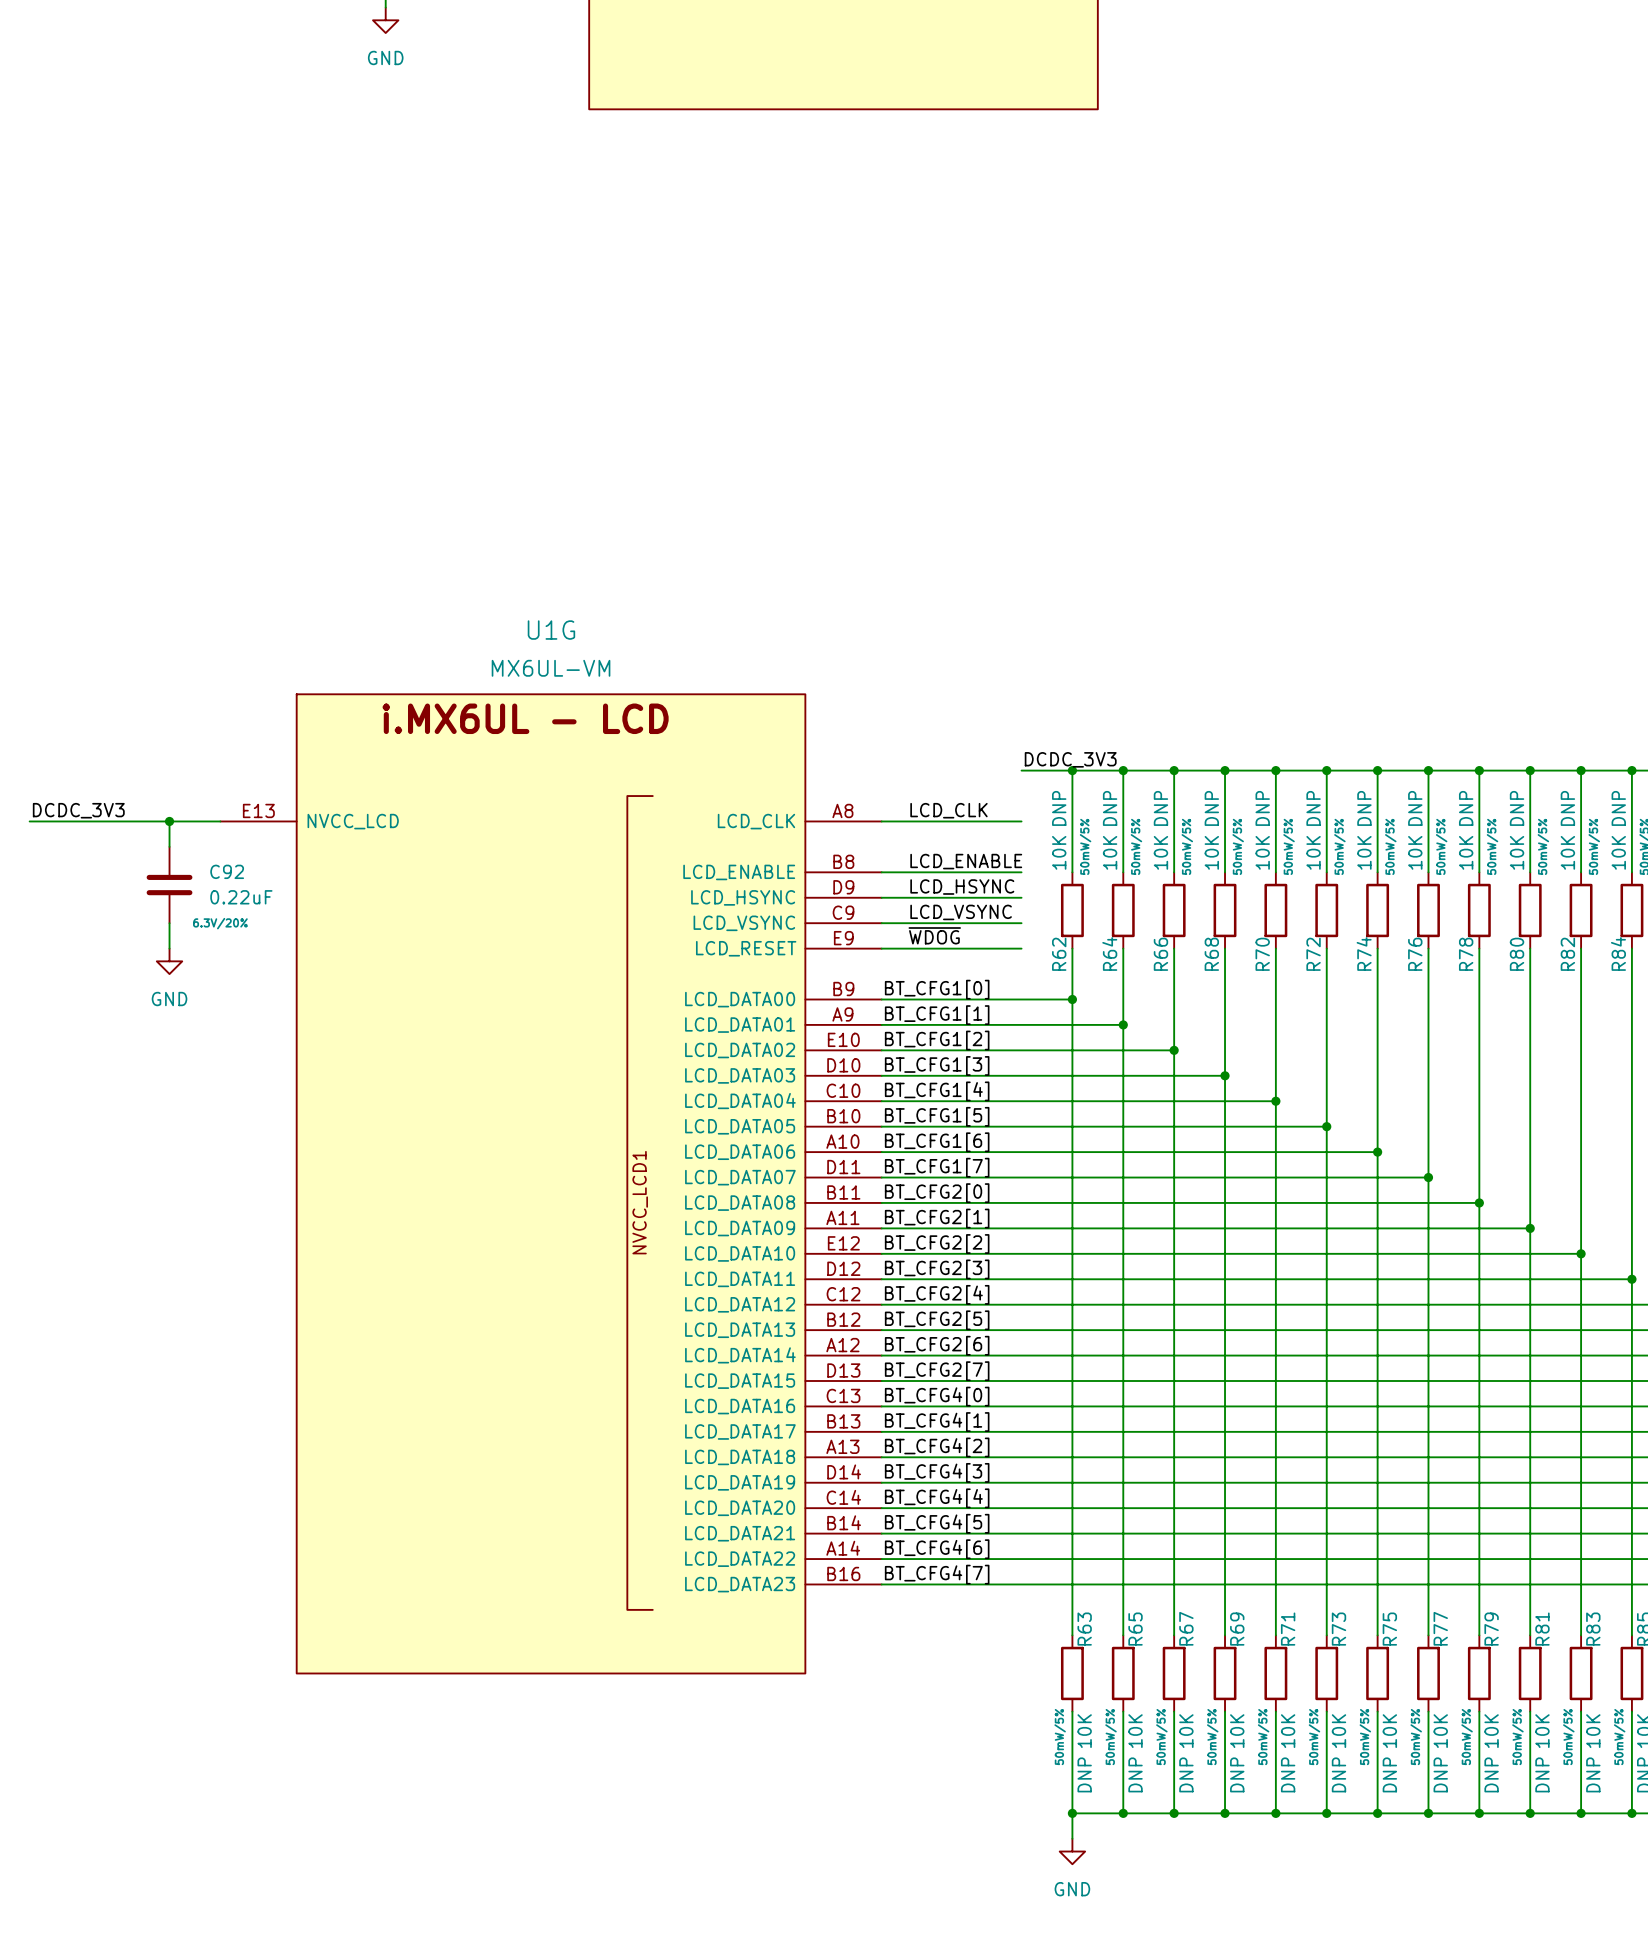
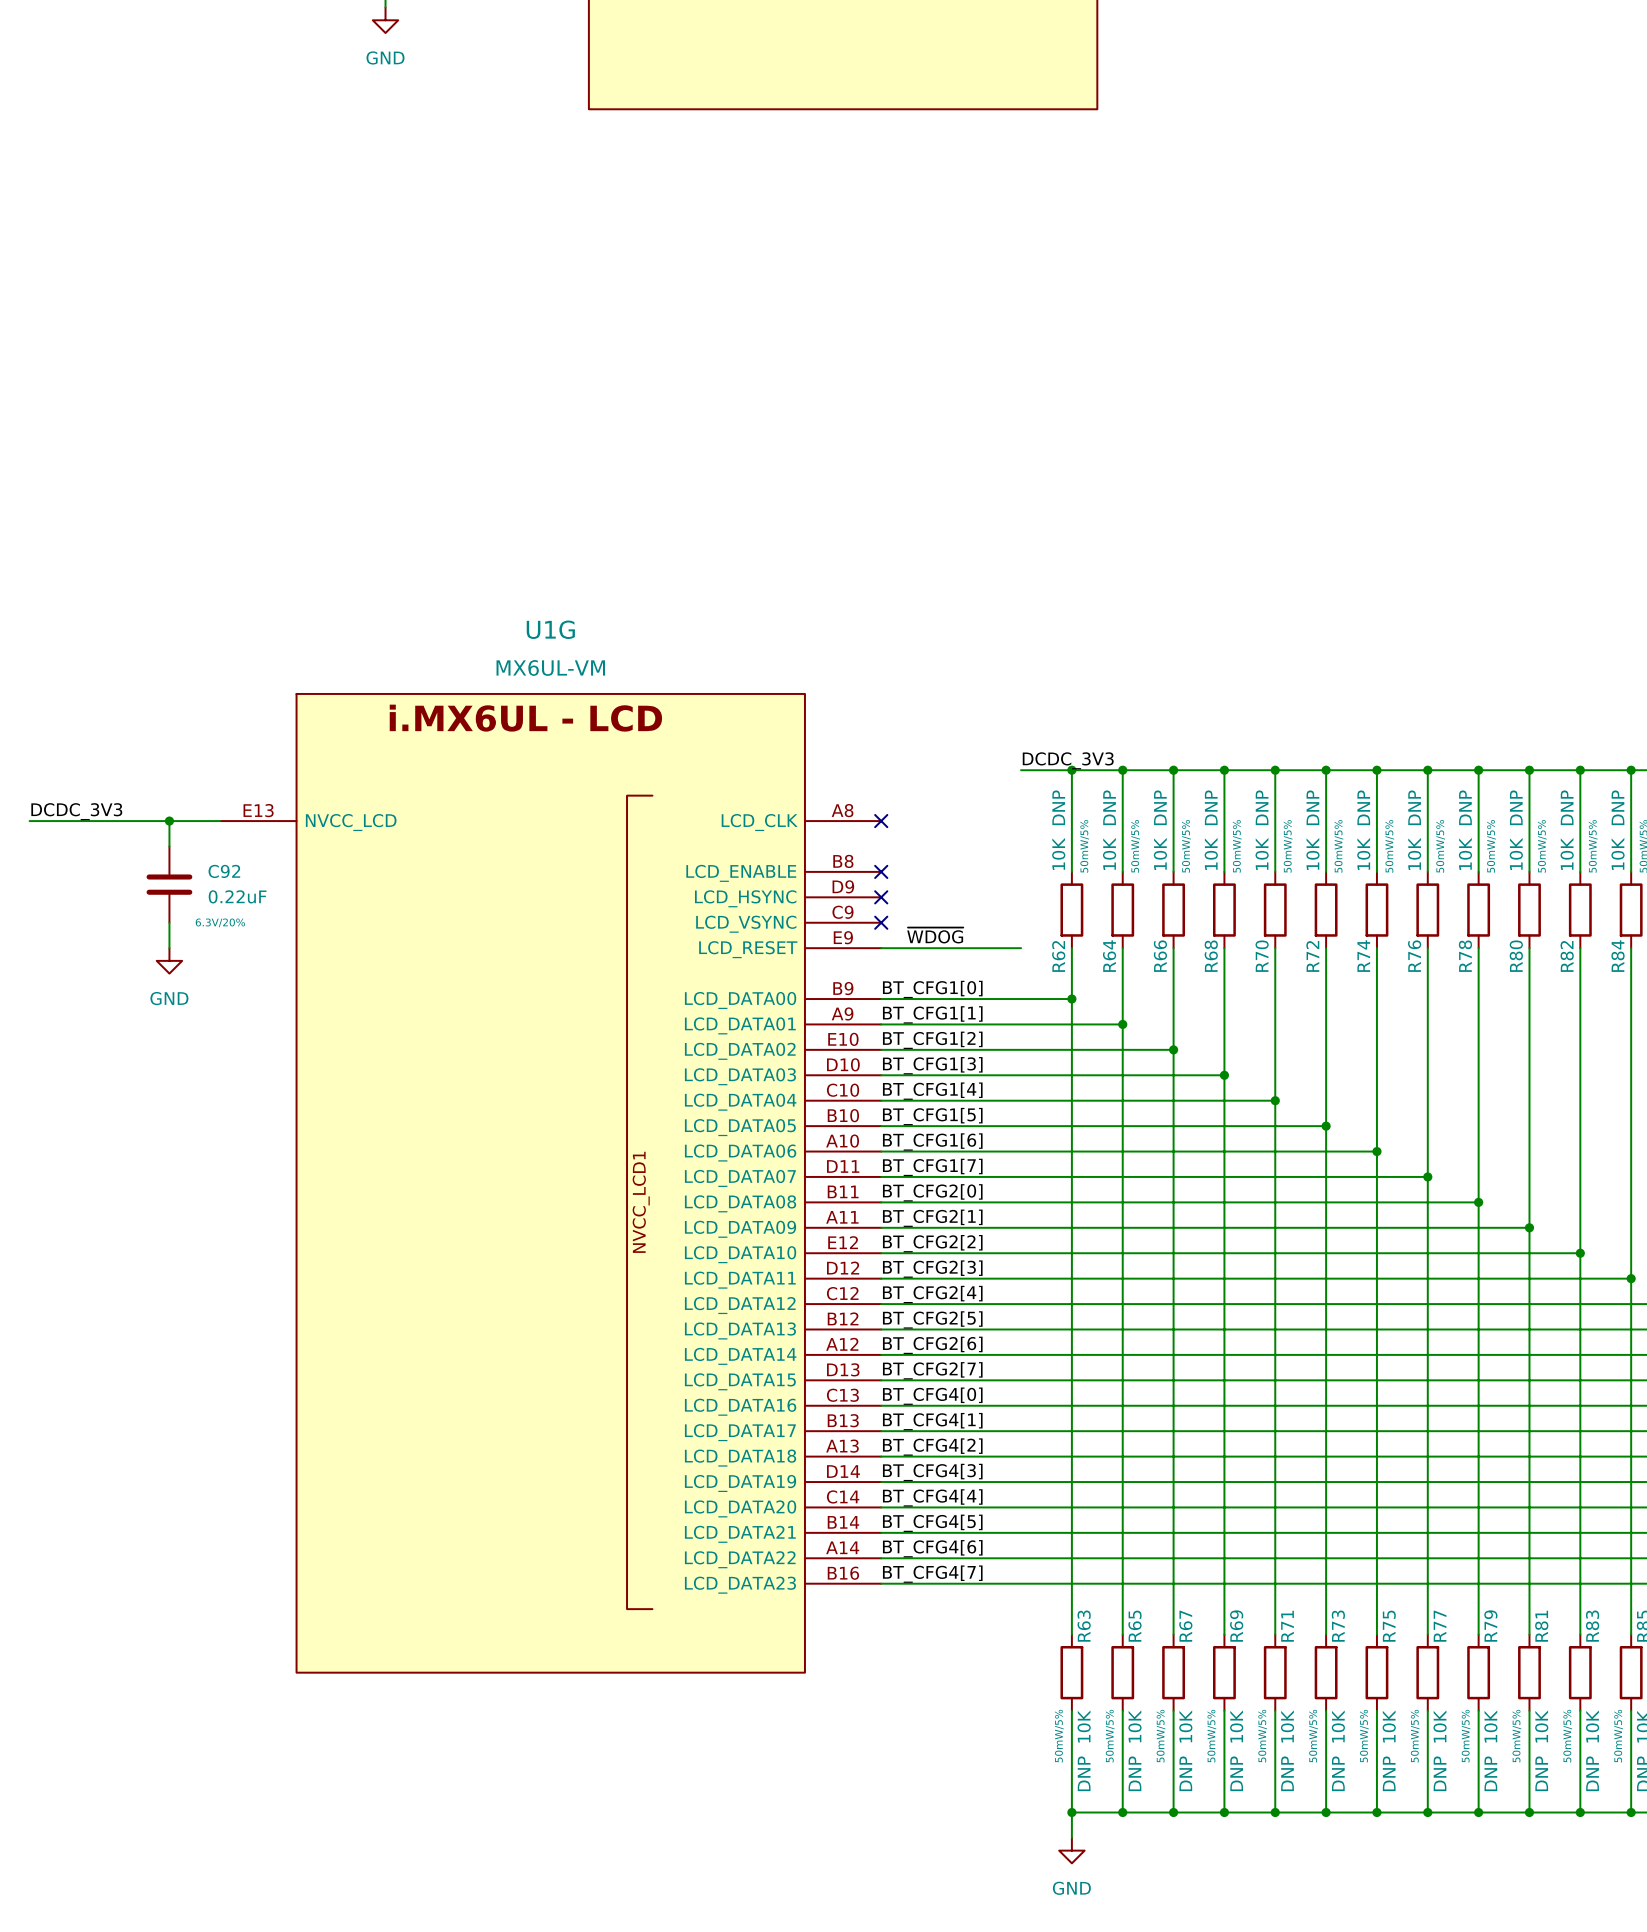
label: LCD_CLK (948, 810) -> none
wire: (881, 821) (1021, 821) -> none
no-connect mark: none -> (881, 821)
label: LCD_ENABLE (966, 861) -> none
wire: (881, 872) (1021, 872) -> none
no-connect mark: none -> (881, 871)
label: LCD_HSYNC (962, 887) -> none
wire: (881, 897) (1021, 897) -> none
no-connect mark: none -> (881, 897)
label: LCD_VSYNC (961, 912) -> none
wire: (881, 923) (1021, 923) -> none
no-connect mark: none -> (881, 922)

